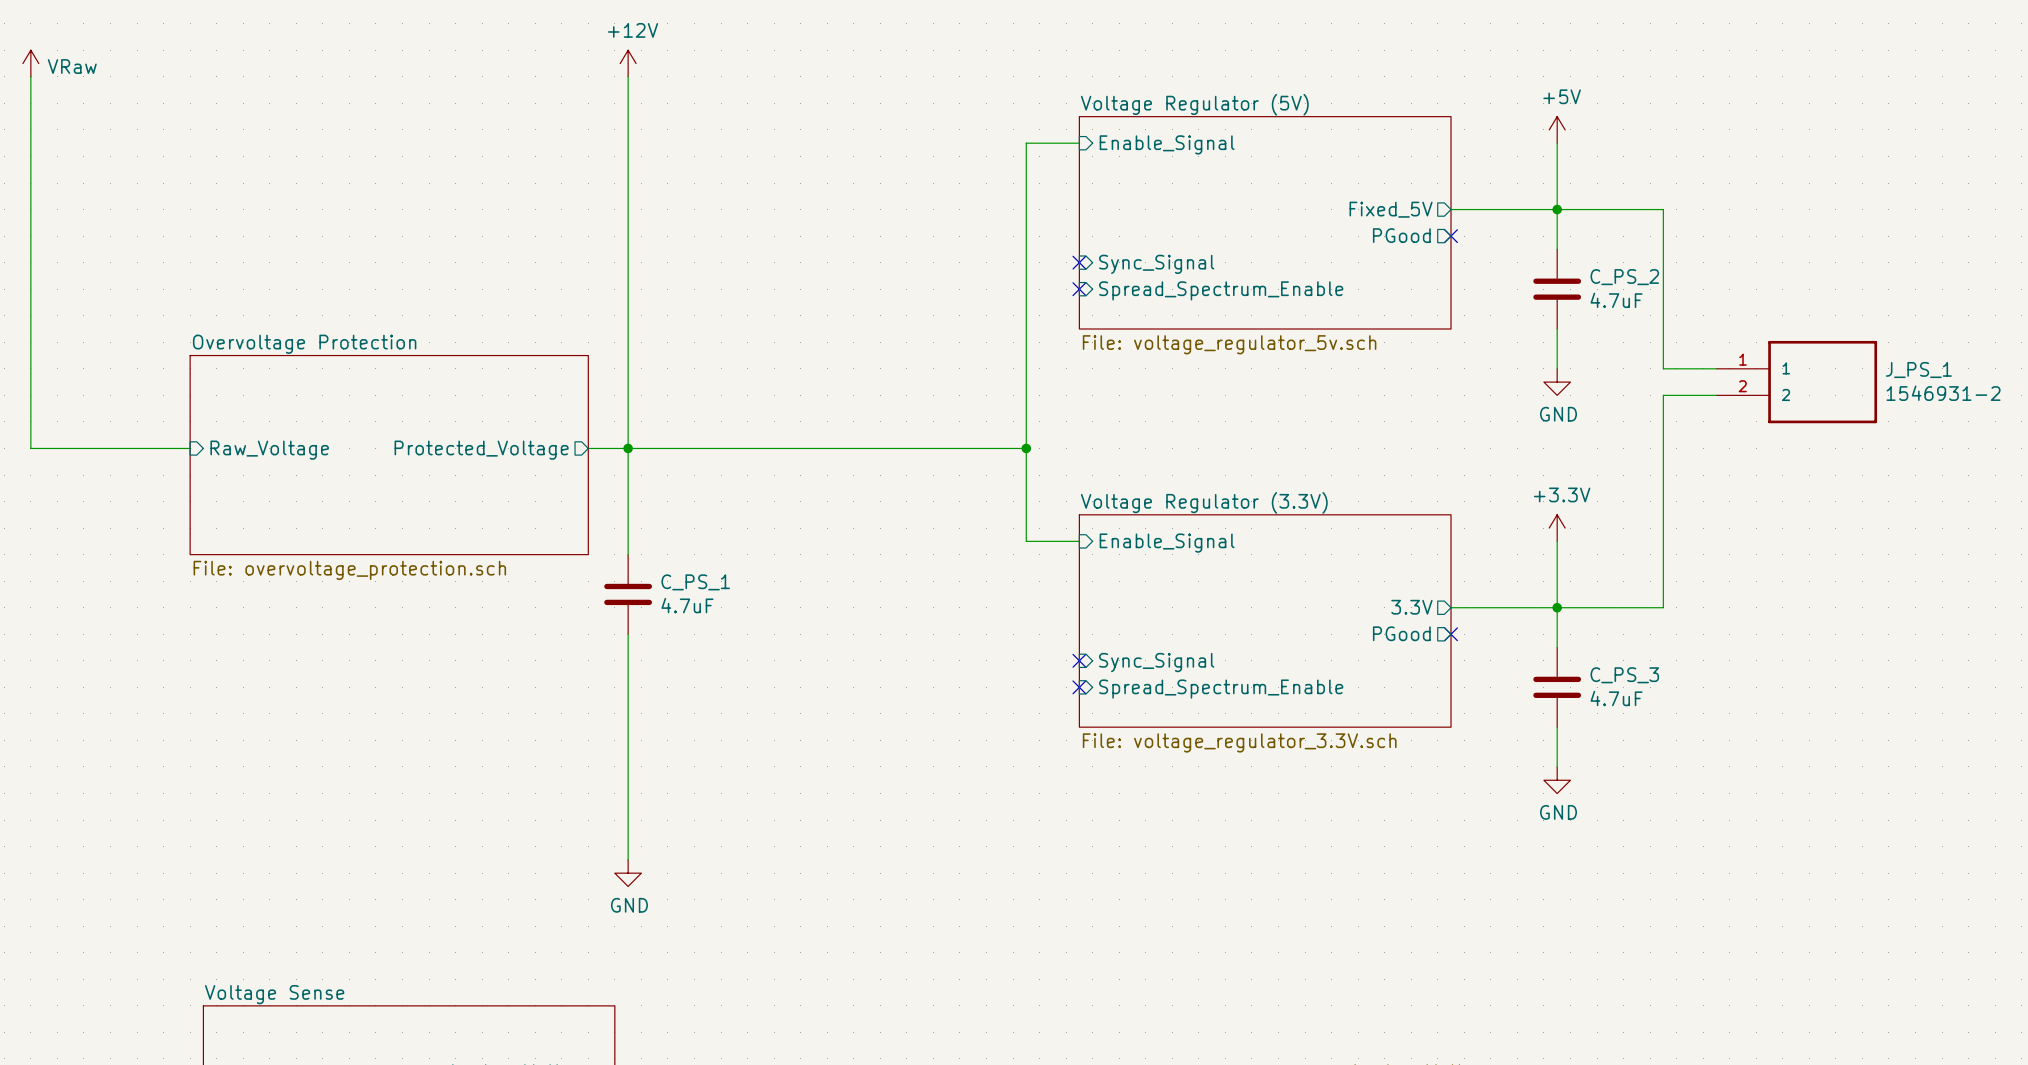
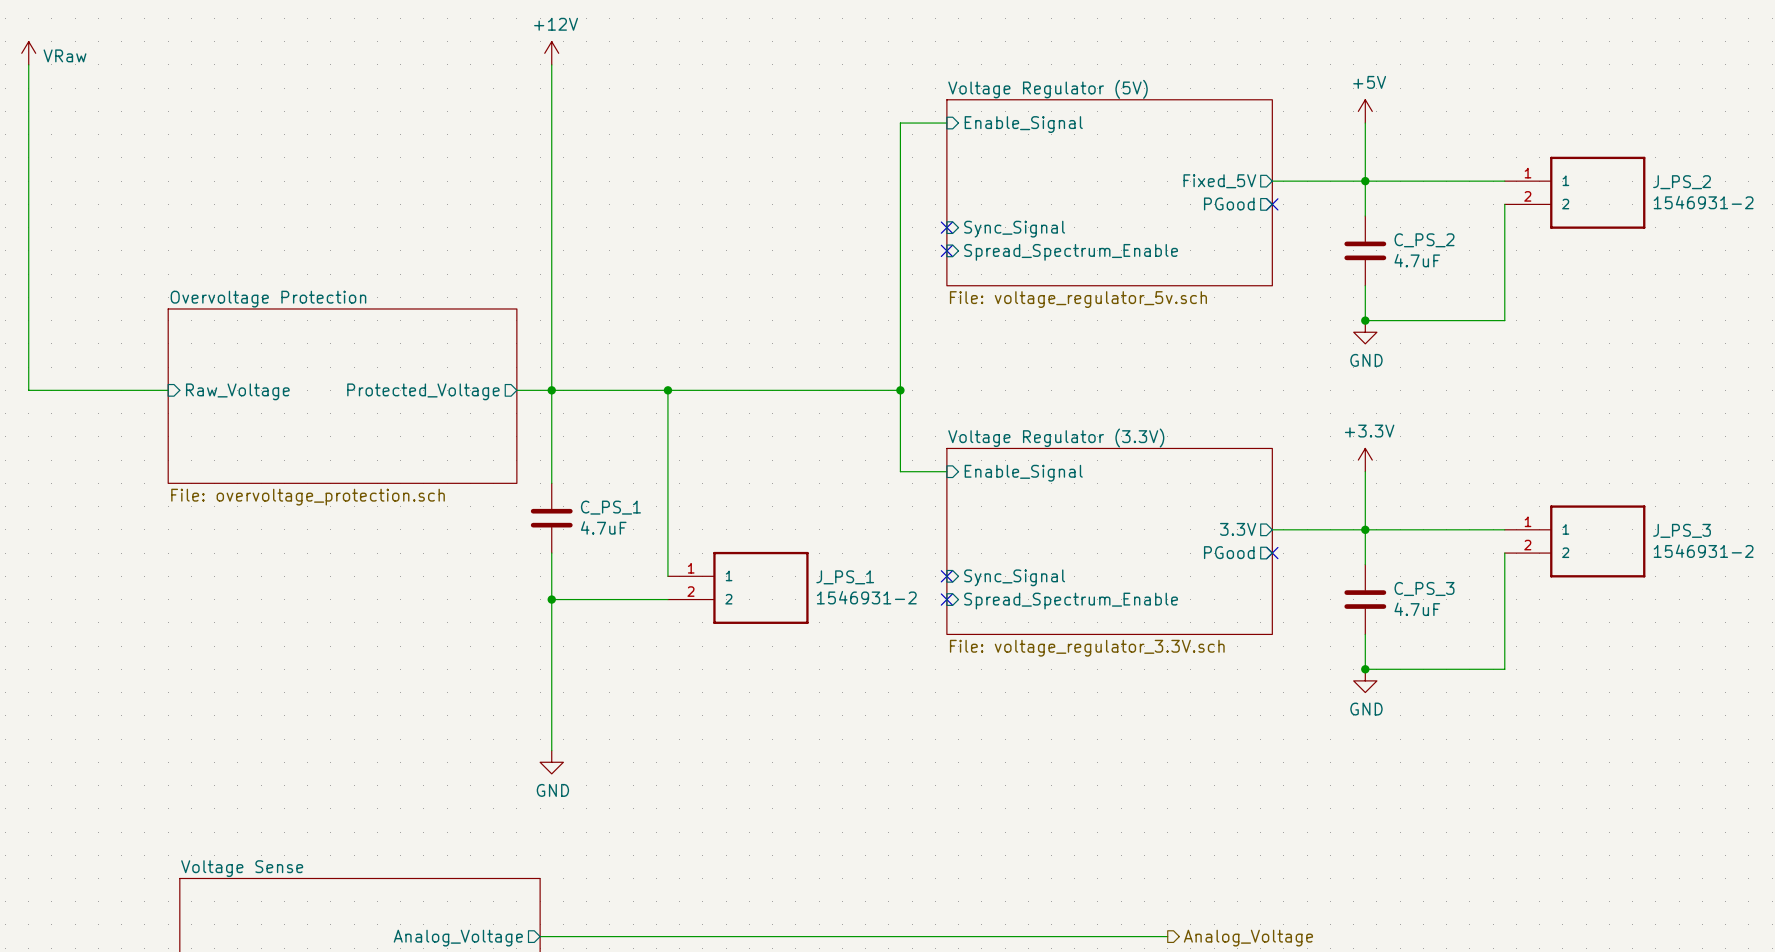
wire: (1663, 209) (1663, 368) -> (1458, 181) (1504, 181)
J_PS_2: none -> 1546931-2 (1575, 192)
wire: none -> (1504, 204) (1504, 320)
wire: none -> (1365, 320) (1458, 320)
junction: none -> (1365, 320)
J_PS_1 position: (1796, 382) -> (738, 587)
wire: (1716, 395) (1663, 395) (1663, 607) -> (1504, 529) (1458, 529)
wire: none -> (667, 390) (667, 576)
junction: none -> (667, 390)
J_PS_3: none -> 1546931-2 (1575, 541)
wire: none -> (1504, 553) (1504, 669) (1365, 669)
wire: none -> (551, 599) (667, 599)
junction: none -> (551, 599)
junction: none -> (1365, 669)

